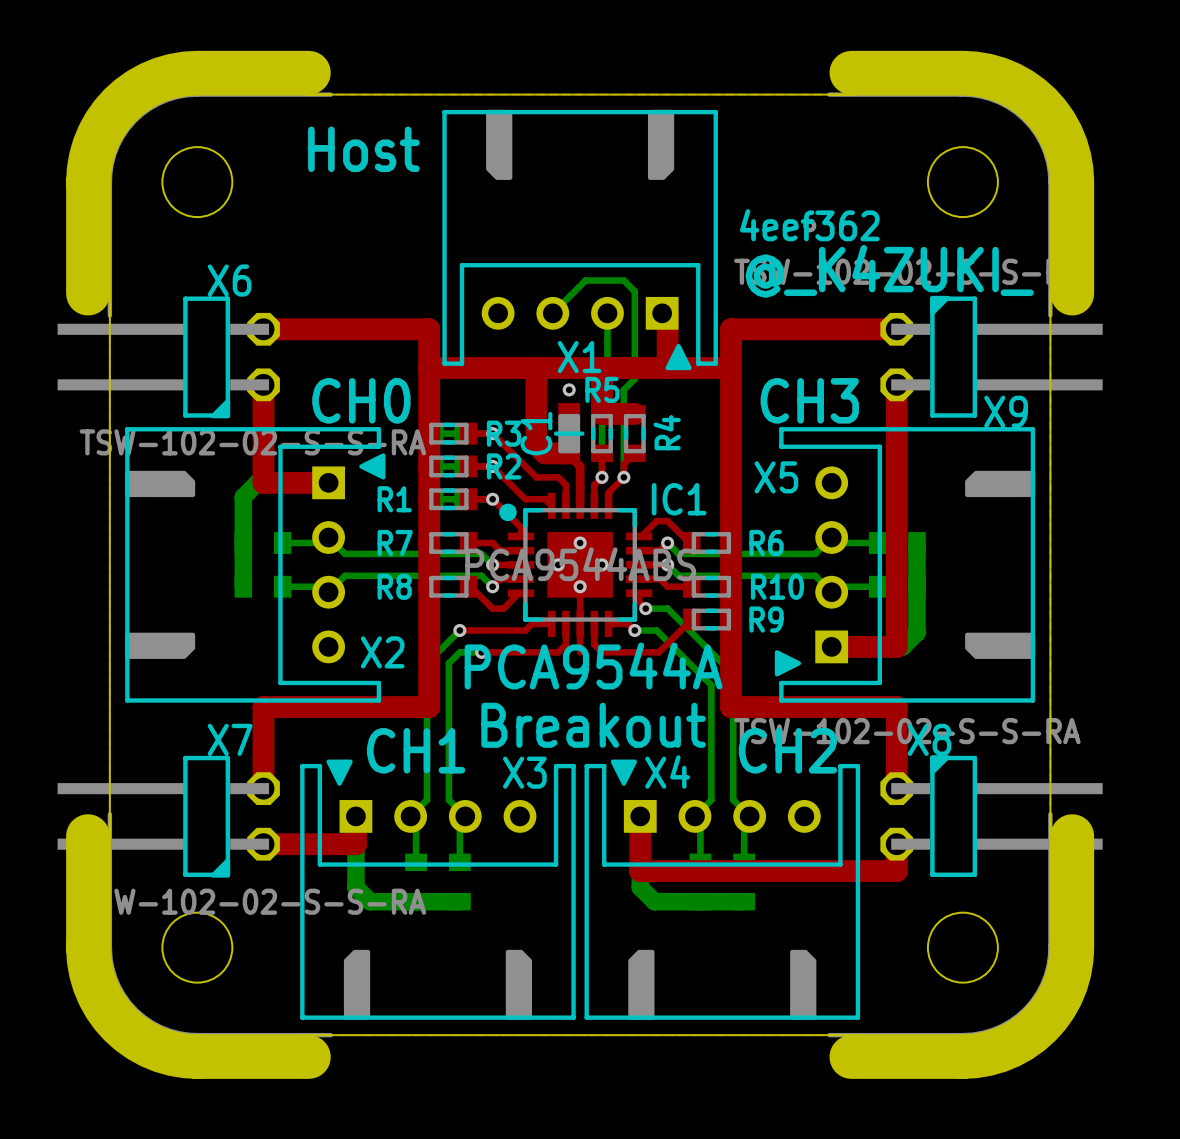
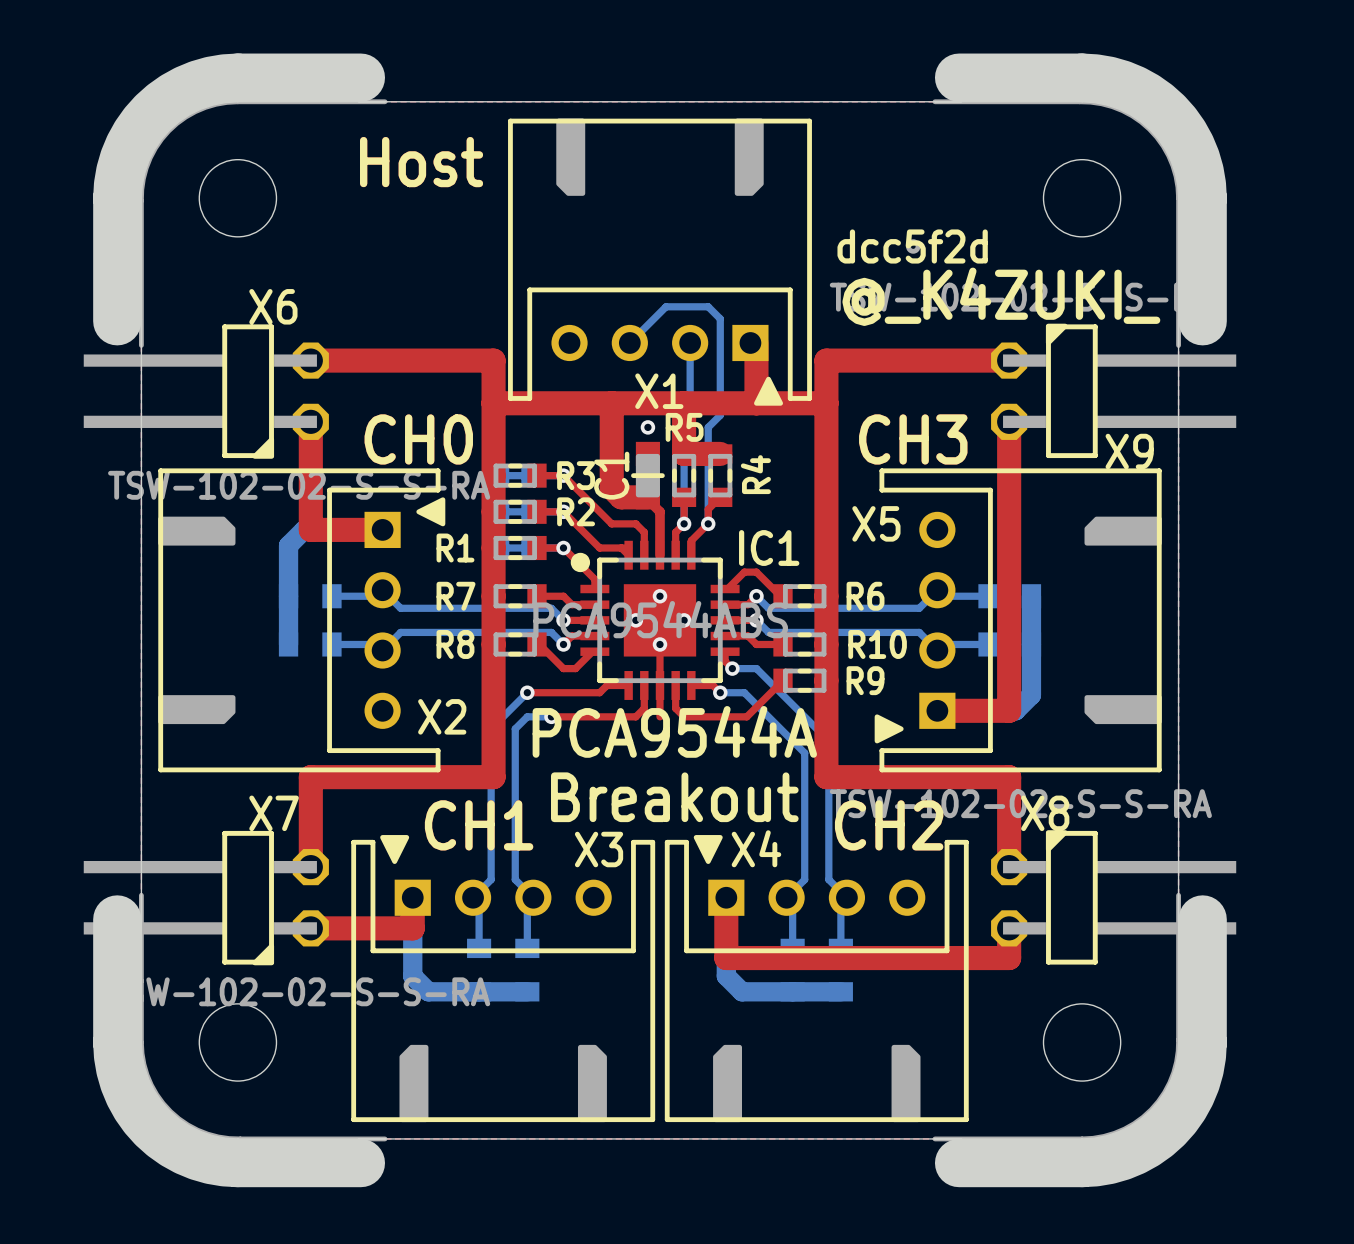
drawing shape: [739, 209, 880, 242] -> [837, 229, 988, 264]

